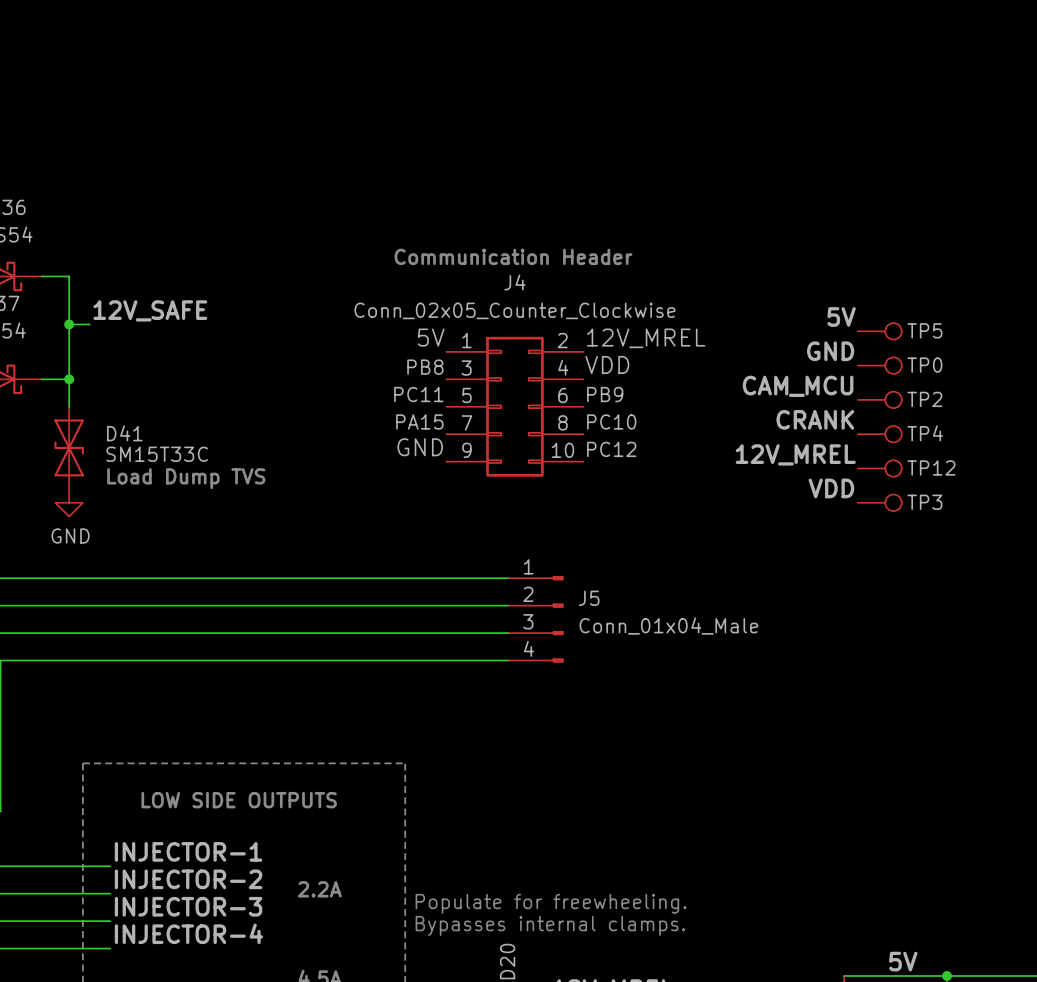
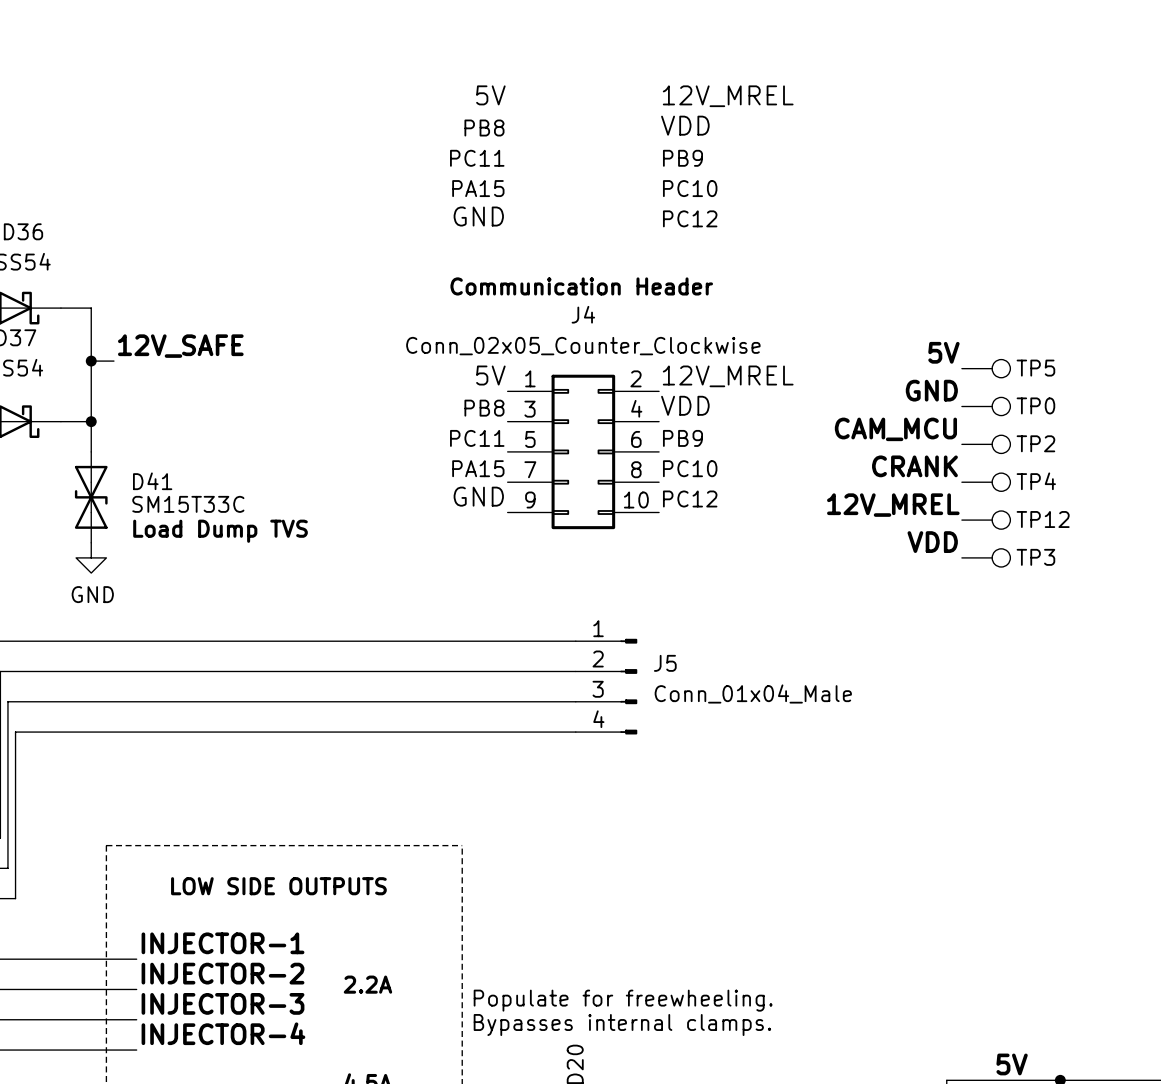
label: none -> 5V (490, 95)
label: none -> 12V_MREL (728, 96)
label: none -> VDD (685, 125)
label: none -> PB8 (484, 128)
label: none -> PC11 (477, 158)
label: none -> PB9 (682, 158)
label: none -> PA15 (478, 188)
label: none -> PC10 (690, 188)
label: none -> GND (478, 216)
label: none -> PC12 (690, 218)

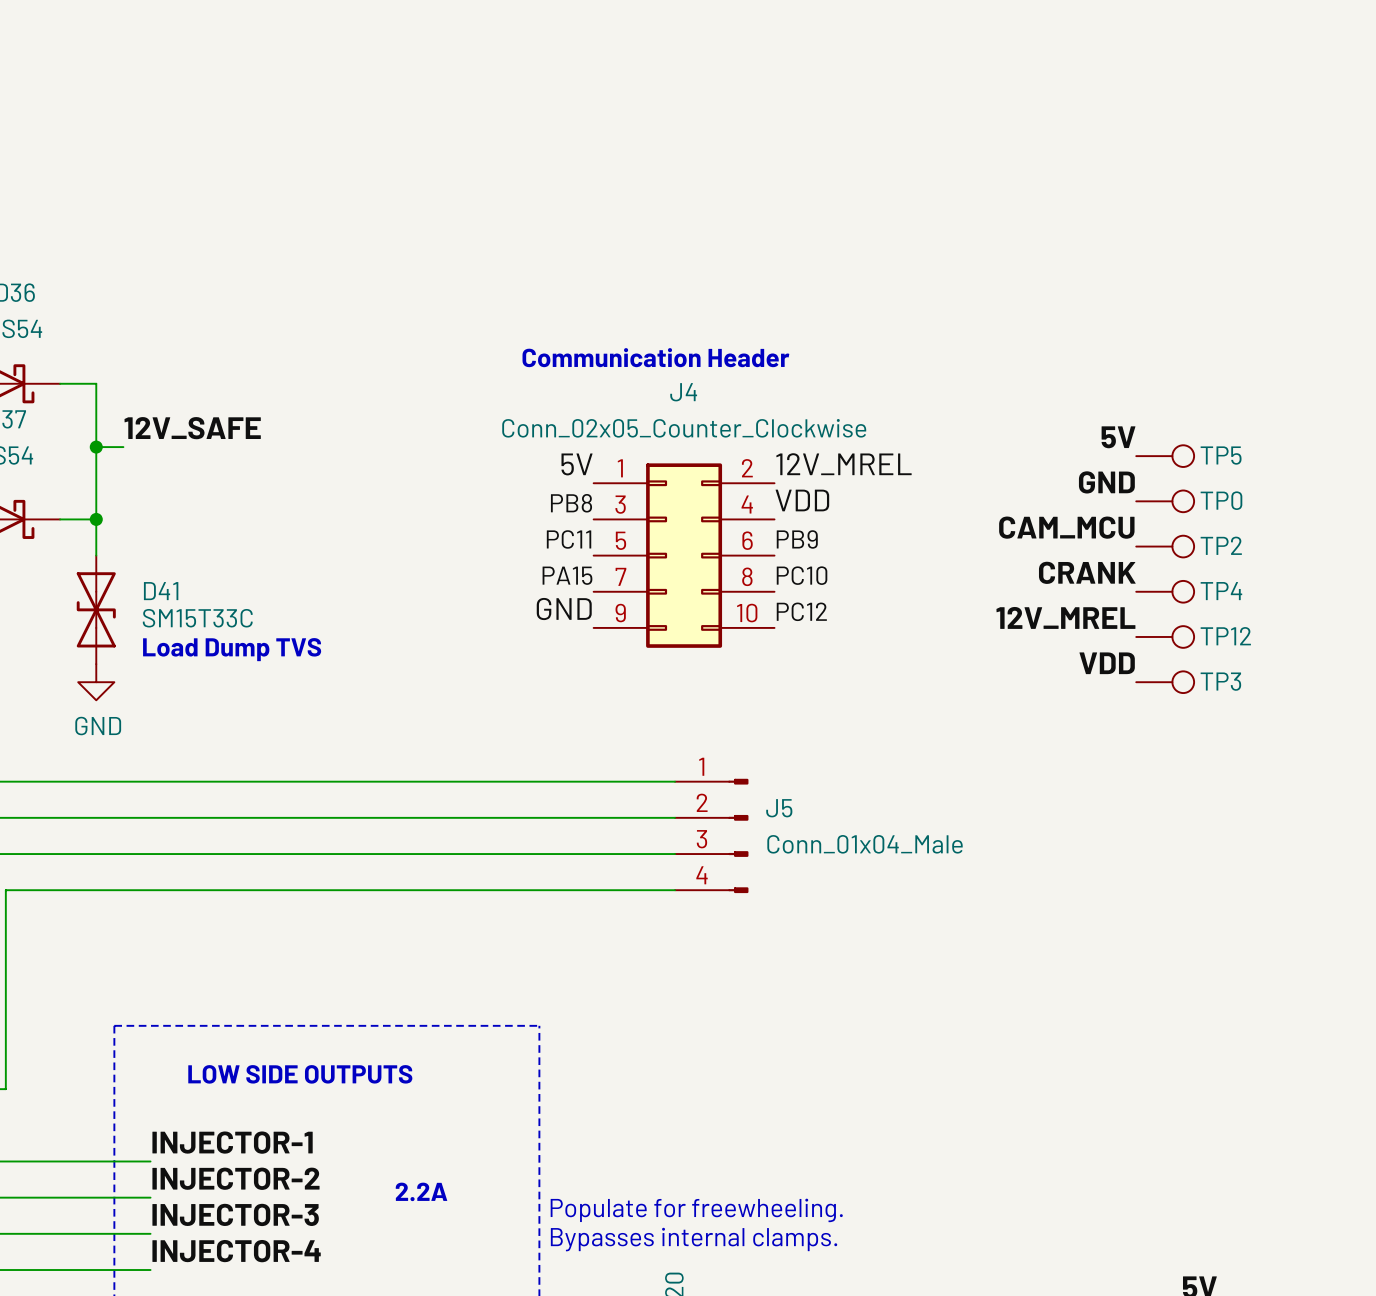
label: 5V (490, 95) -> none
label: 12V_MREL (728, 96) -> none
label: VDD (685, 125) -> none
label: PB8 (484, 128) -> none
label: PC11 (477, 158) -> none
label: PB9 (682, 158) -> none
label: PA15 (478, 188) -> none
label: PC10 (690, 188) -> none
label: GND (478, 216) -> none
label: PC12 (690, 218) -> none

